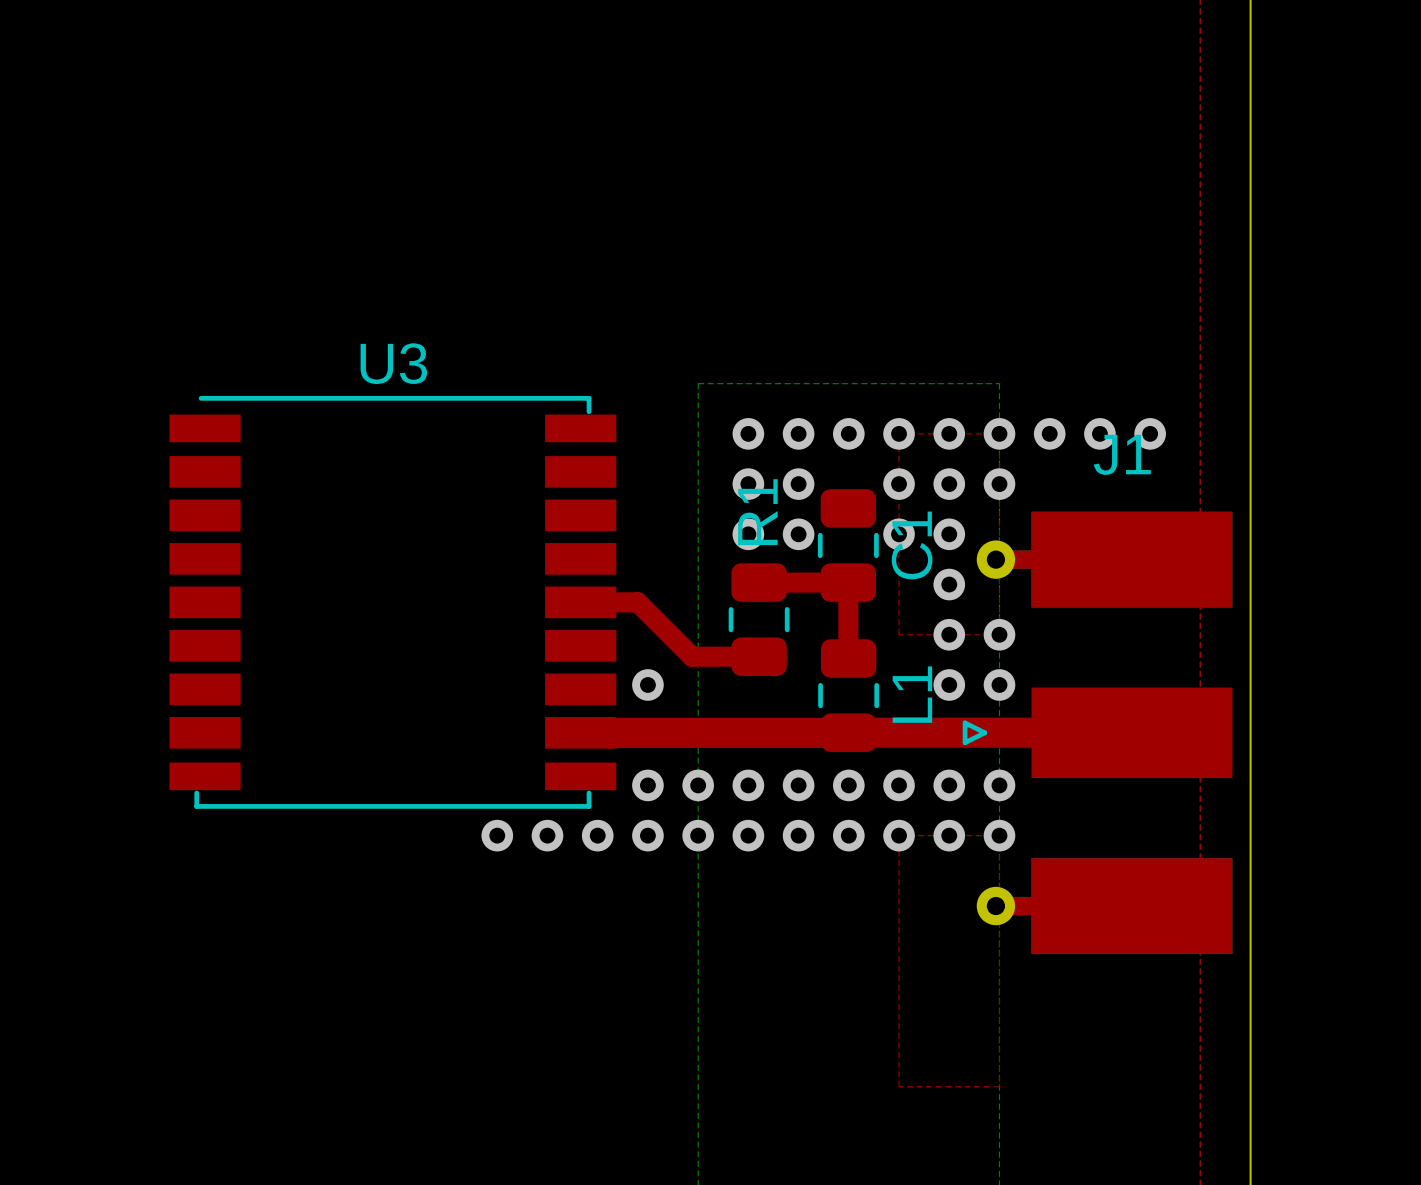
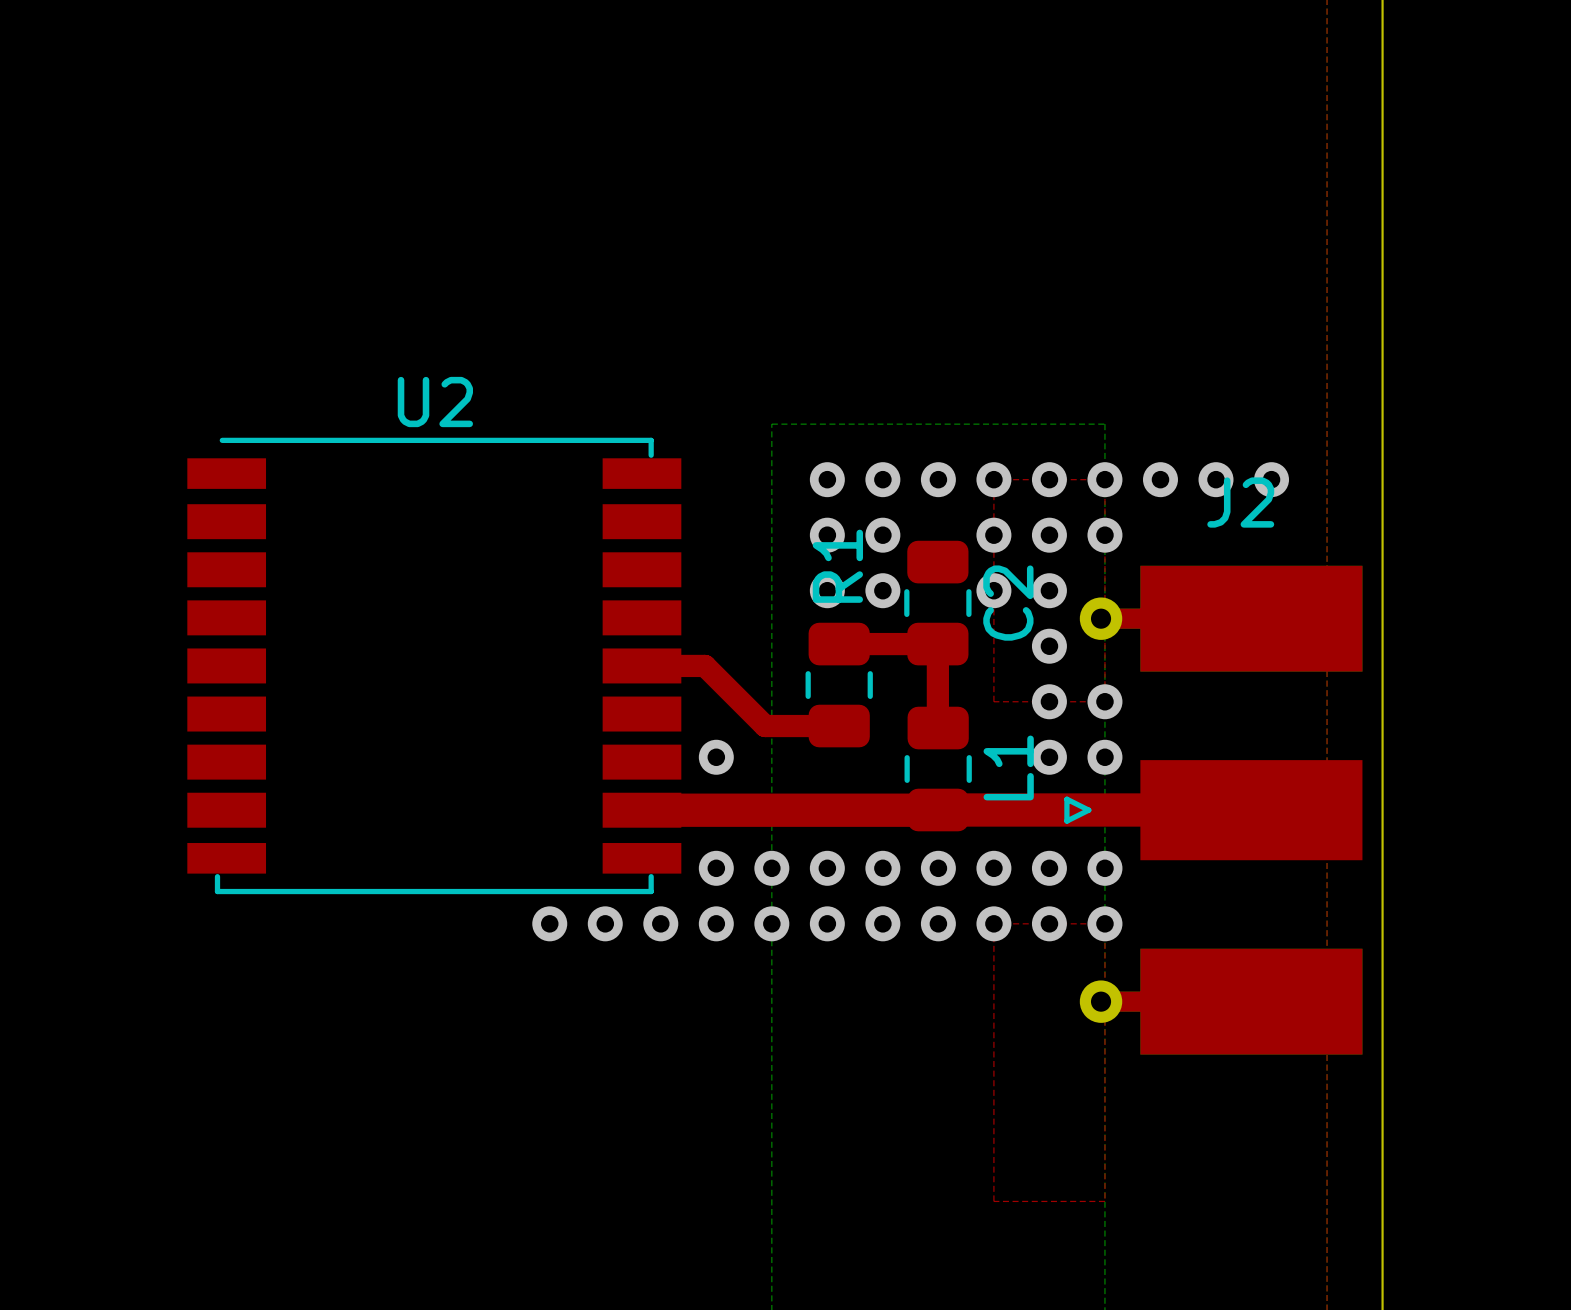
U3 name: U3 (393, 363) -> U2 (435, 402)
J1 name: J1 (1122, 454) -> J2 (1240, 502)
C1 name: C1 (912, 545) -> C2 (1008, 603)

